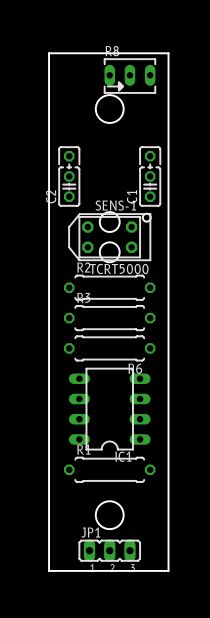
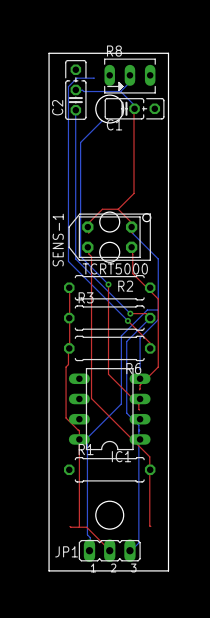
bottom track: none -> (94, 78) (76, 78) (68, 86) (68, 261) (127, 320)
bottom track: none -> (134, 78) (120, 91)
bottom track: none -> (75, 89) (120, 91)
bottom track: none -> (120, 91) (134, 104) (134, 108)
bottom track: none -> (114, 108) (80, 142) (80, 256) (108, 284)
top track: none -> (134, 108) (134, 193) (118, 209)
bottom track: none -> (75, 110) (75, 258) (130, 313)
C2 position: (69, 176) -> (75, 89)
C1 rotation: 0° (150, 176) -> 90° clockwise (134, 108)
C1 position: (150, 176) -> (134, 108)
SENS-1 name rotation: 0° (115, 205) -> 90° counterclockwise (58, 240)
top track: none -> (118, 209) (102, 209) (89, 222) (88, 233)
top track: none -> (118, 209) (131, 222) (132, 233)
bottom track: none -> (132, 233) (158, 259) (158, 319) (140, 337) (139, 369)
top track: none -> (88, 253) (91, 256) (91, 398) (149, 456) (150, 526)
top track: none -> (132, 253) (132, 273) (158, 299) (158, 367) (140, 385) (139, 389)
R2 name position: R2 (83, 267) -> R2 (125, 286)
top track: none -> (108, 284) (108, 374) (138, 404) (139, 410)
via: none -> (108, 284)
top track: none -> (69, 290) (69, 342) (68, 364) (66, 367) (66, 418) (79, 431) (79, 527)
bottom track: none -> (158, 309) (147, 309) (121, 335) (121, 403) (87, 437) (87, 534) (90, 537) (90, 551)
top track: none -> (130, 313) (146, 313) (150, 317)
via: none -> (130, 313)
bottom track: none -> (150, 317) (126, 341) (126, 413) (138, 425) (139, 430) (138, 543) (130, 551)
top track: none -> (127, 320) (150, 343)
via: none -> (127, 320)
top track: none -> (69, 526) (86, 527) (110, 551)
JP1 name position: JP1 (90, 532) -> JP1 (66, 551)

